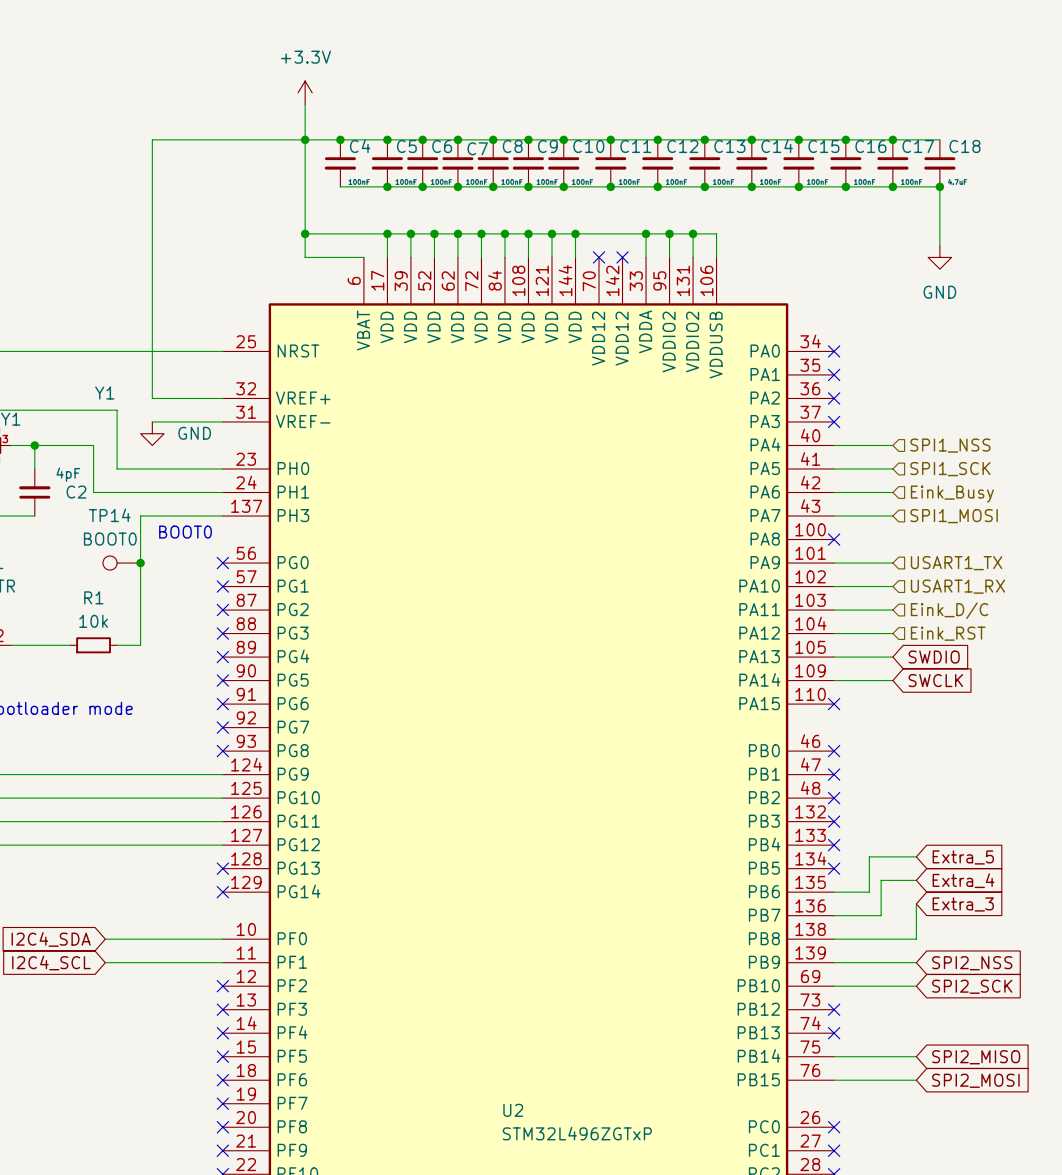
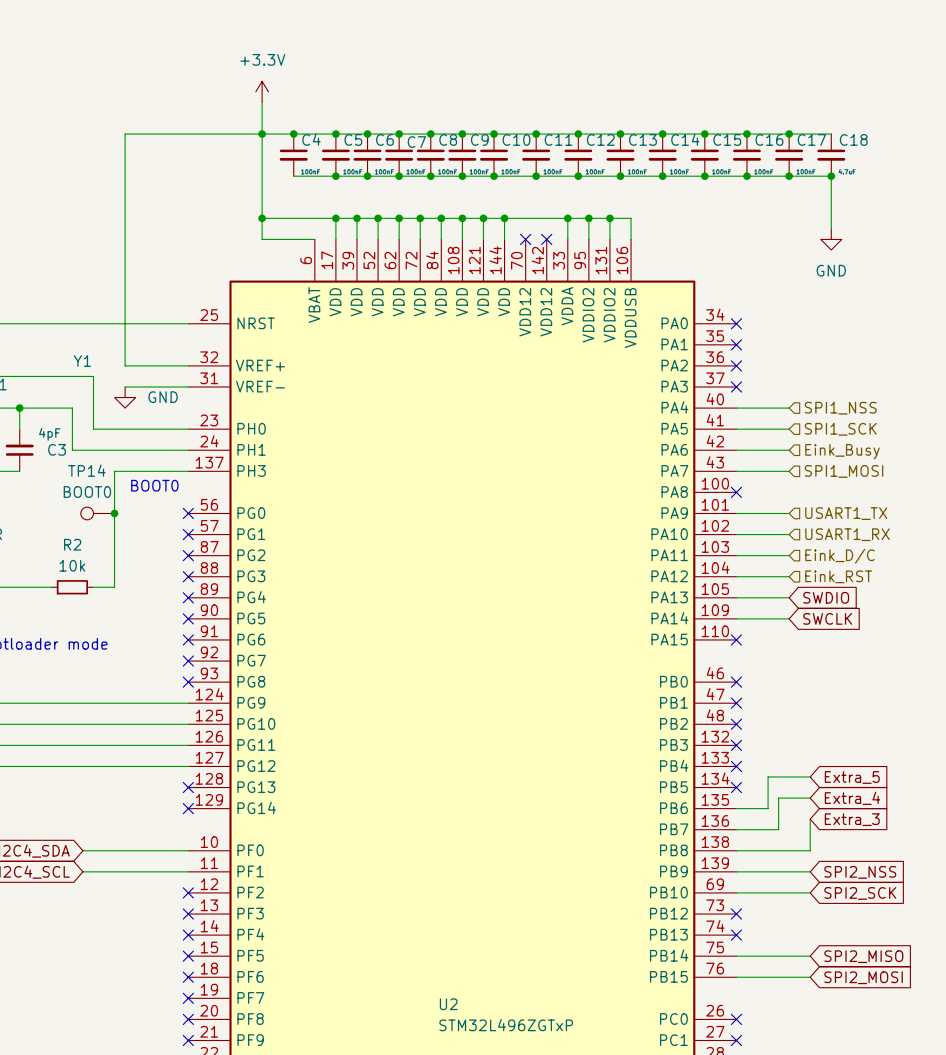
C2 name: C2 (76, 492) -> C3 (57, 449)
R1 name: R1 (93, 597) -> R2 (72, 544)

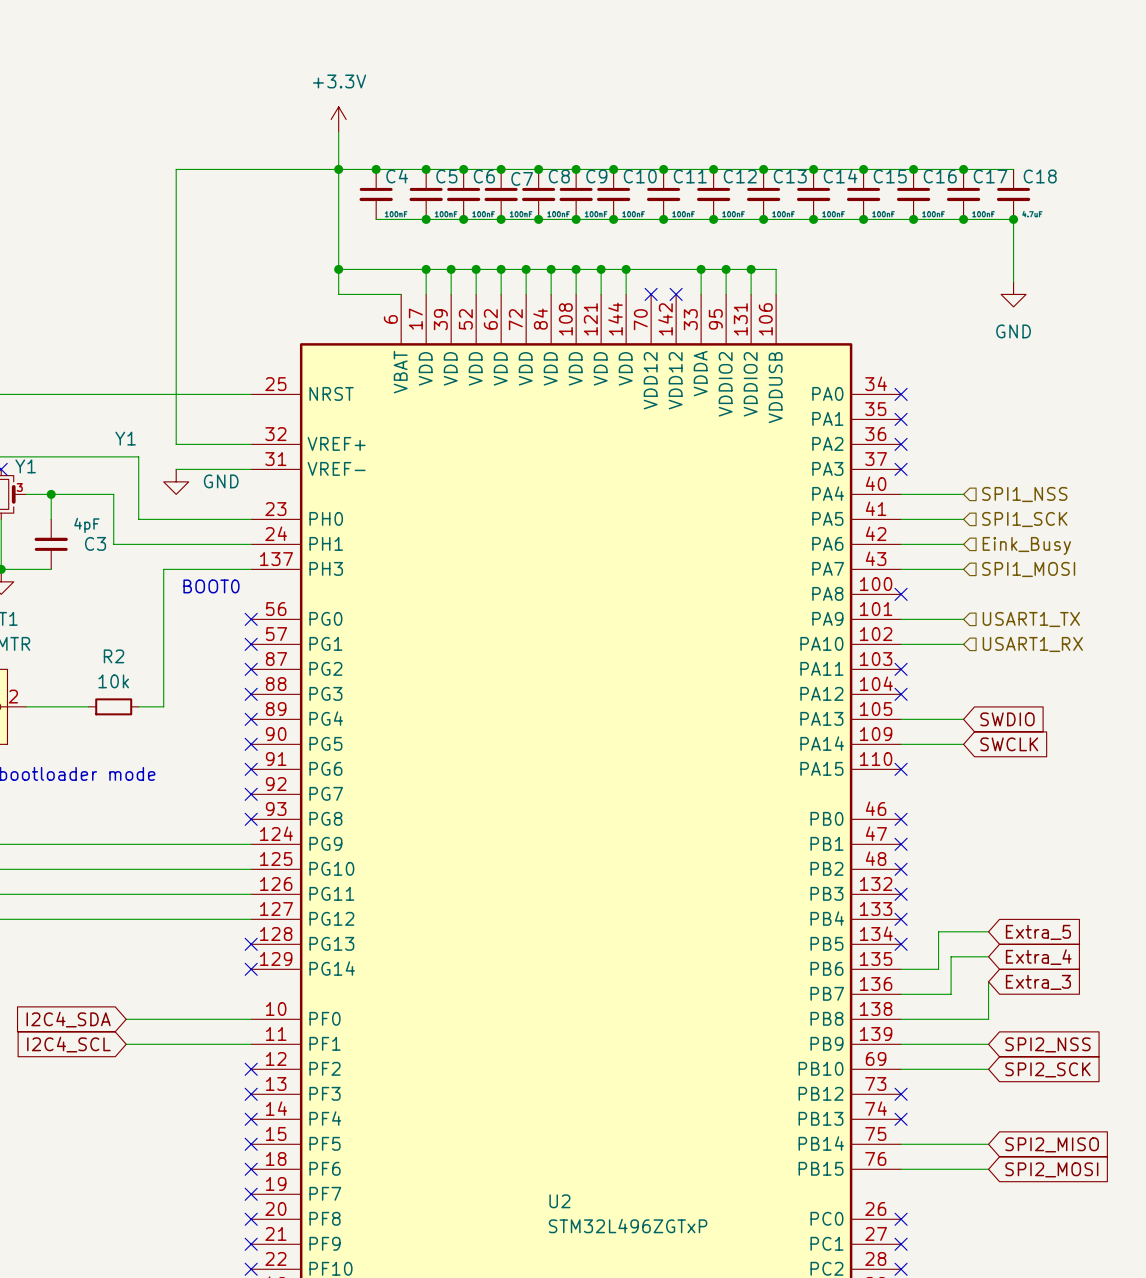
TP14: BOOT0 (97, 513) -> none
junction: (114, 513) -> none
wire: (736, 555) (789, 555) -> none
no-connect mark: none -> (901, 669)
hierarchical label: Eink_D/C (840, 556) -> none
wire: (736, 576) (789, 576) -> none
no-connect mark: none -> (901, 694)
hierarchical label: Eink_RST (838, 576) -> none

